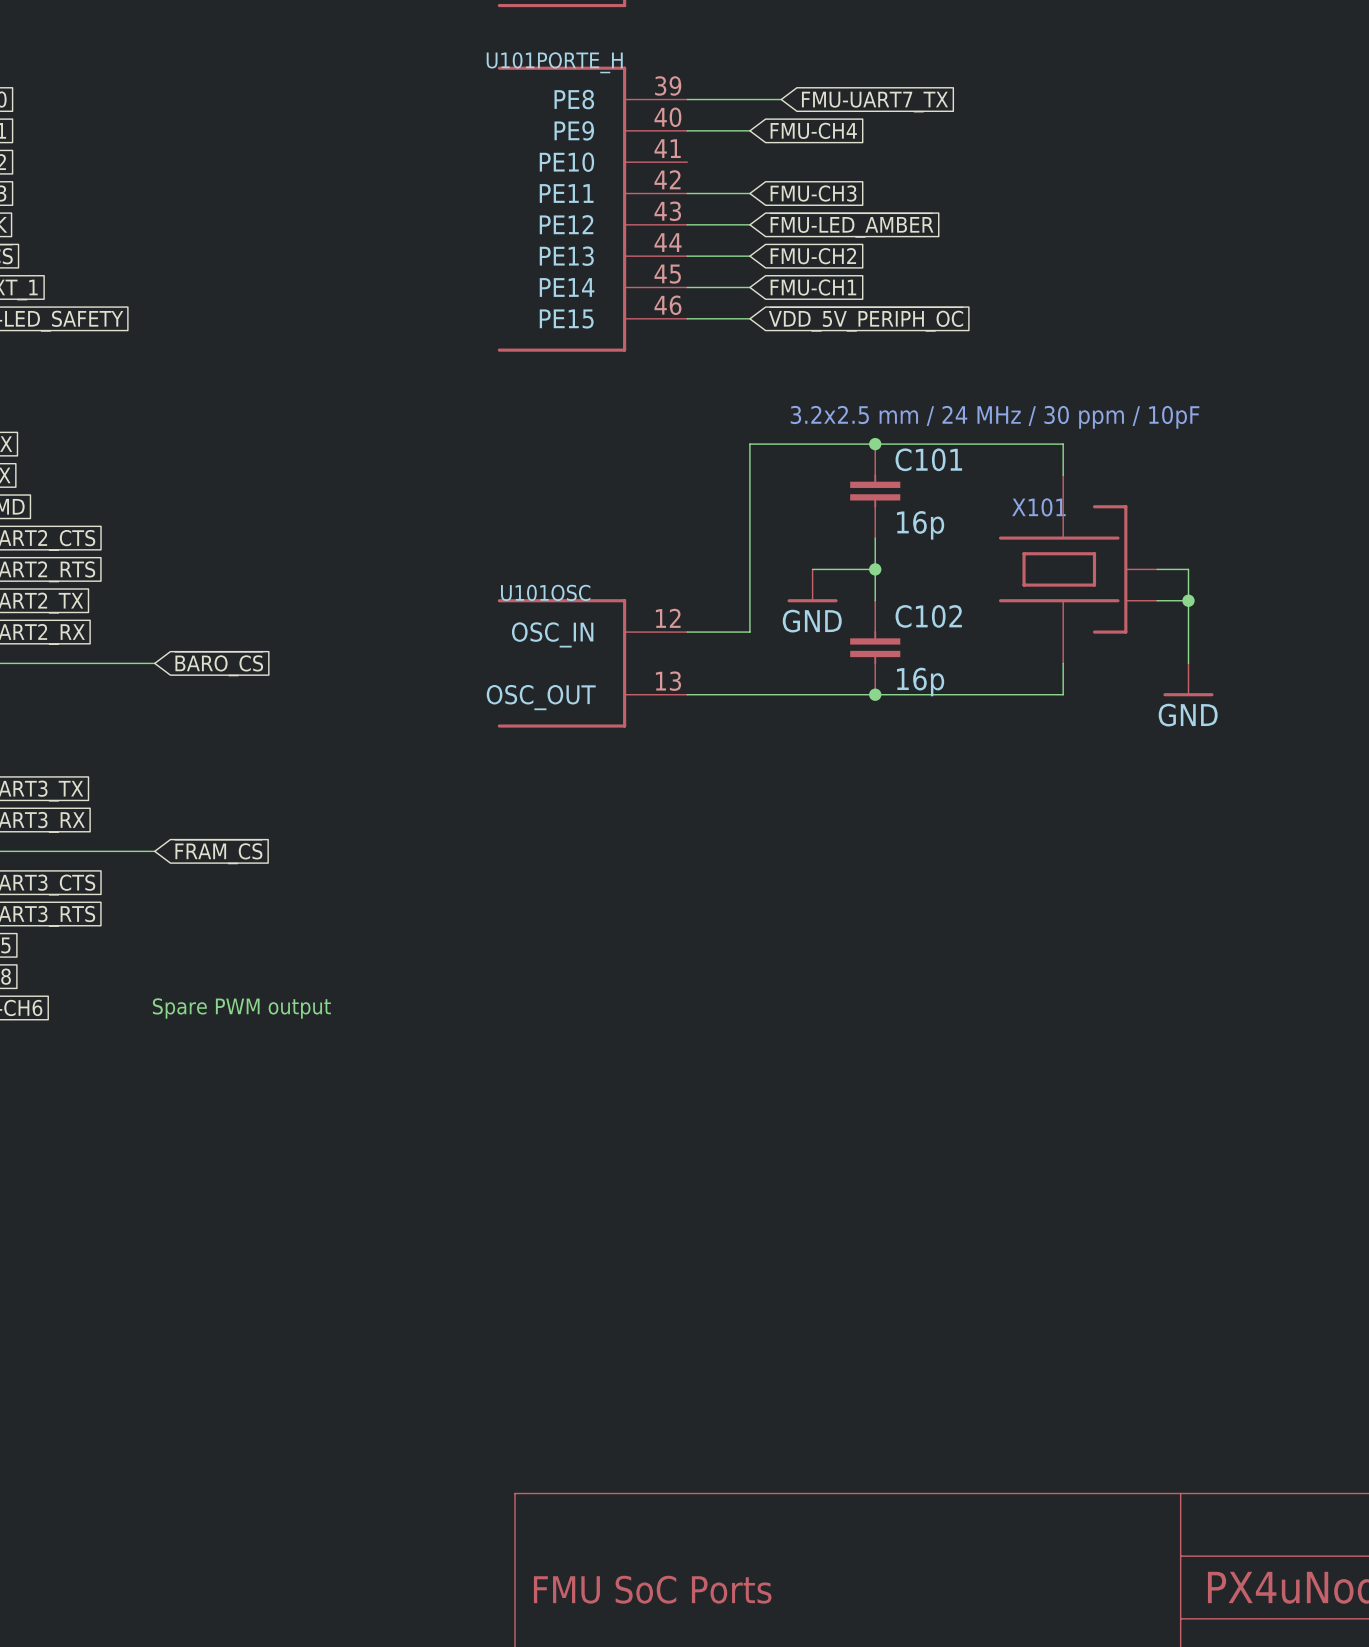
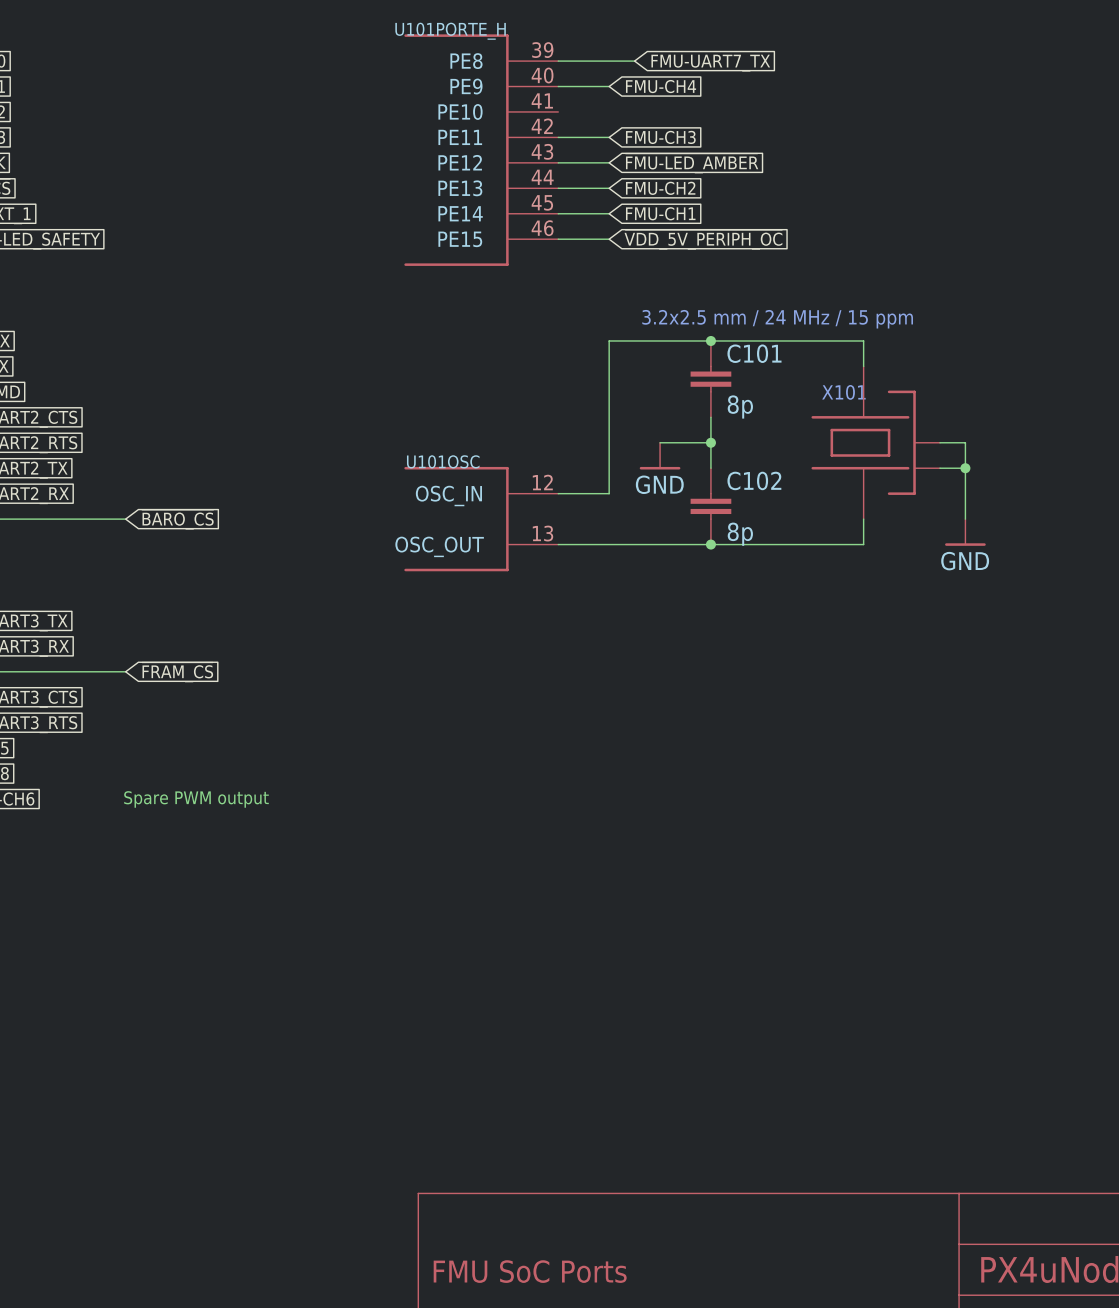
X101 value: 3.2x2.5 mm / 24 MHz / 30 ppm / 10pF (995, 417) -> 3.2x2.5 mm / 24 MHz / 15 ppm (777, 319)
C101 value: 16p (920, 525) -> 8p (740, 406)
C102 value: 16p (920, 681) -> 8p (740, 534)

